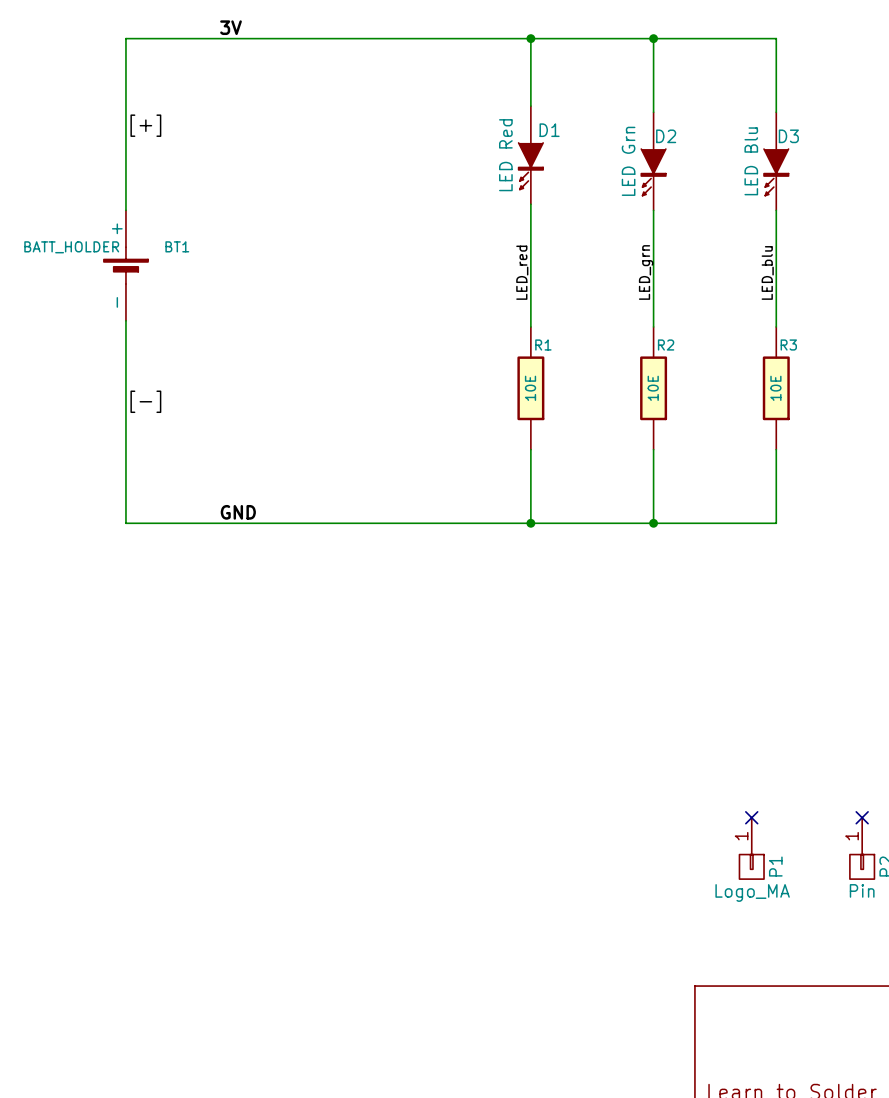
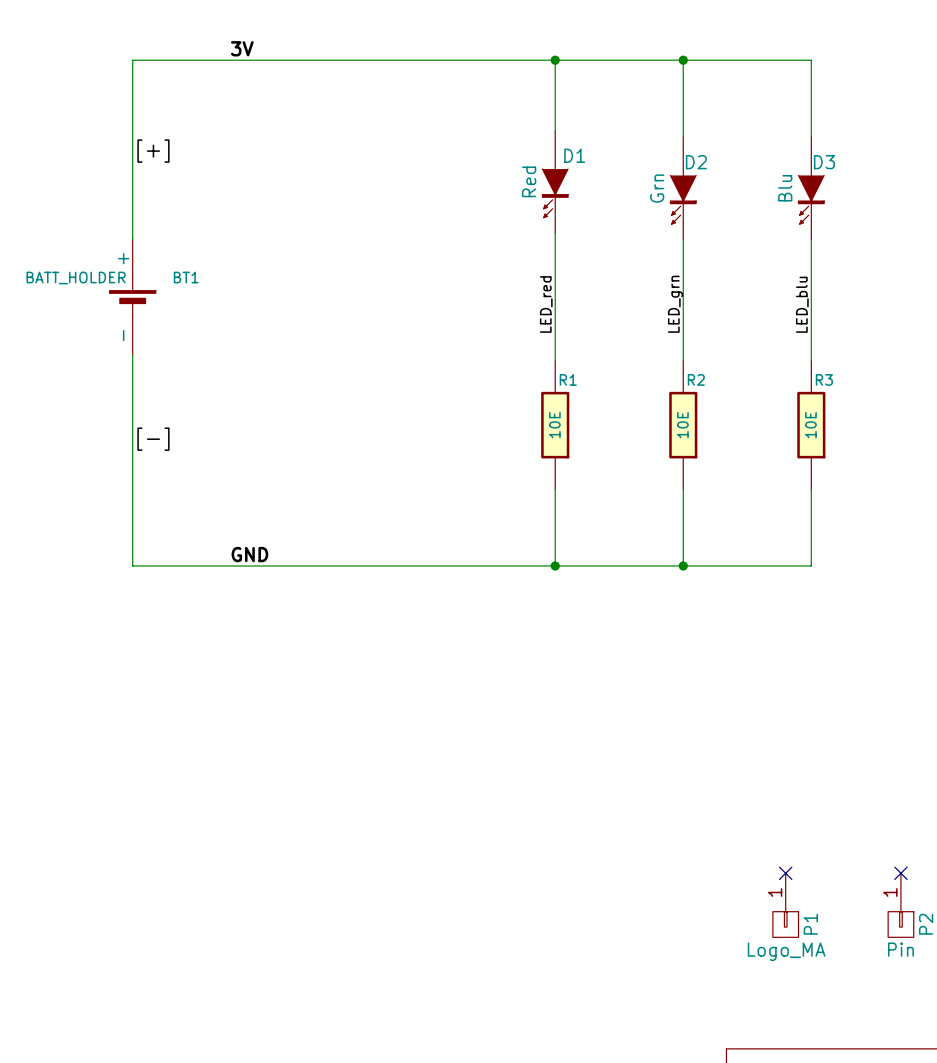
D1 value: LED Red (505, 155) -> Red (529, 181)
D2 value: LED Grn (628, 161) -> Grn (657, 188)
D3 value: LED Blu (751, 161) -> Blu (785, 188)

